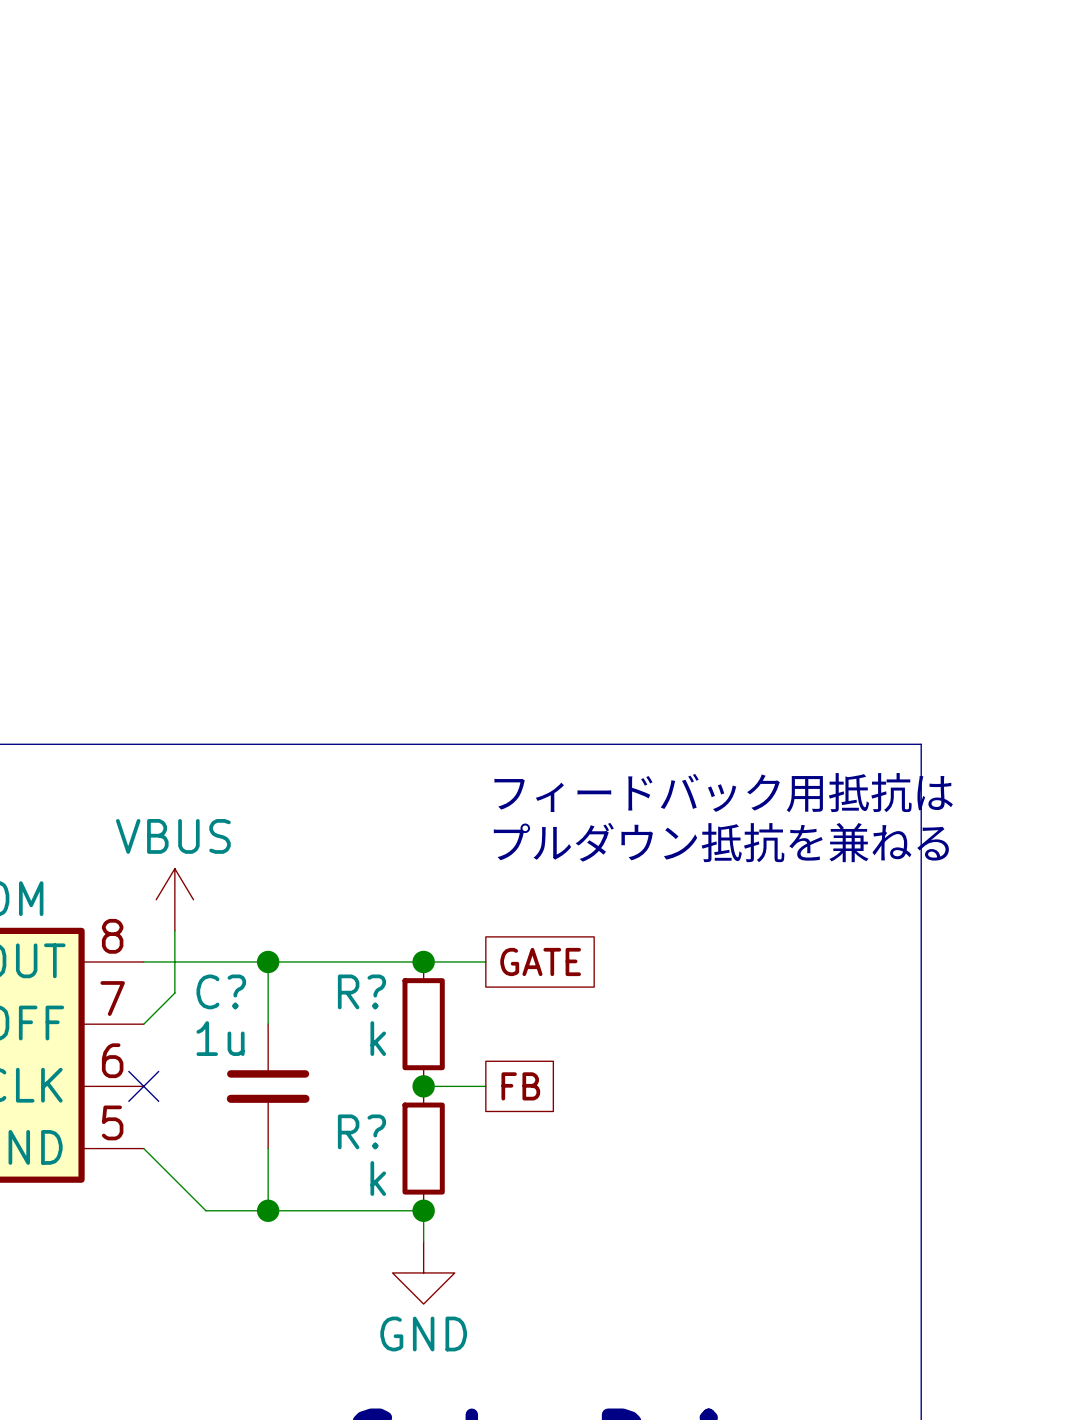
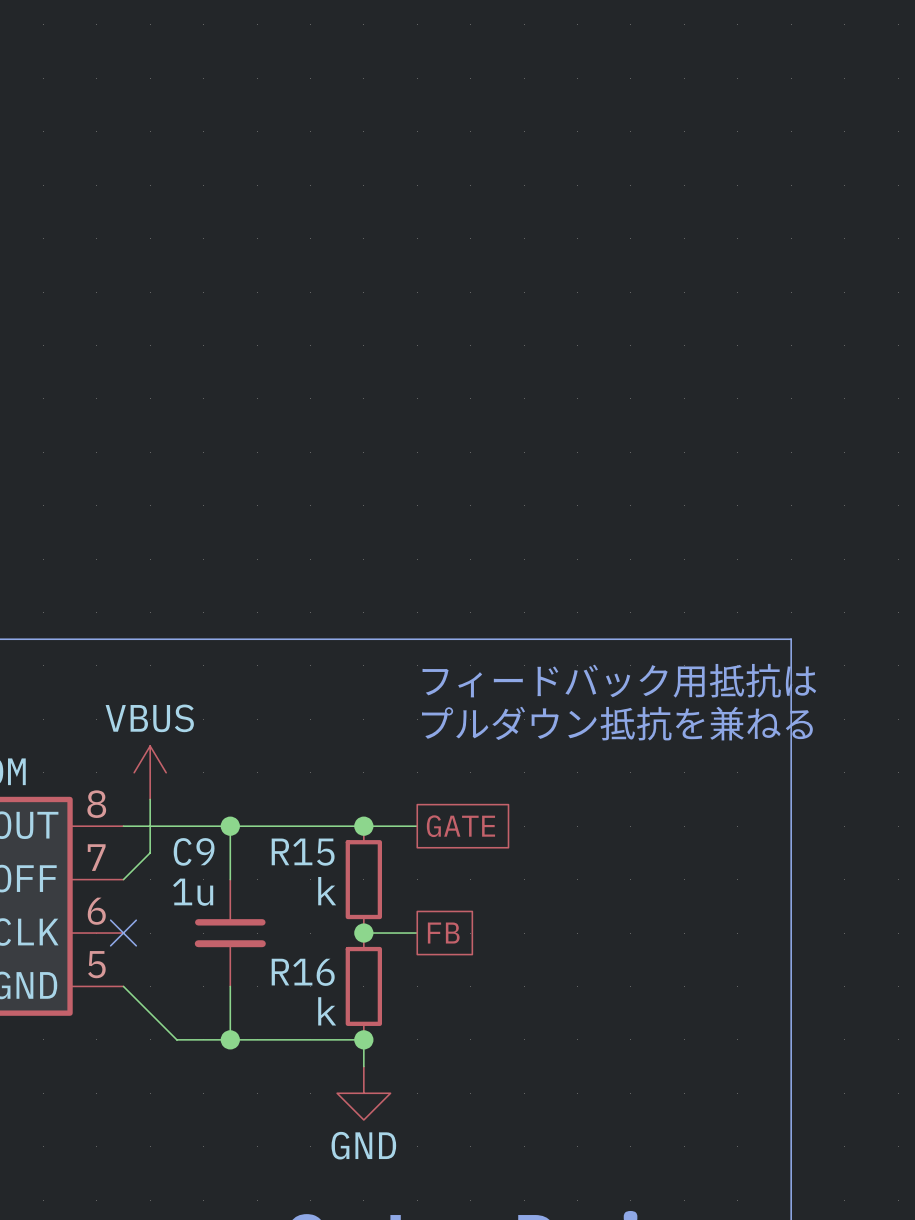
C? name: C? (221, 991) -> C9 (194, 851)
R? name: R? (361, 991) -> R15 (303, 852)
R? name: R? (361, 1131) -> R16 (303, 972)

